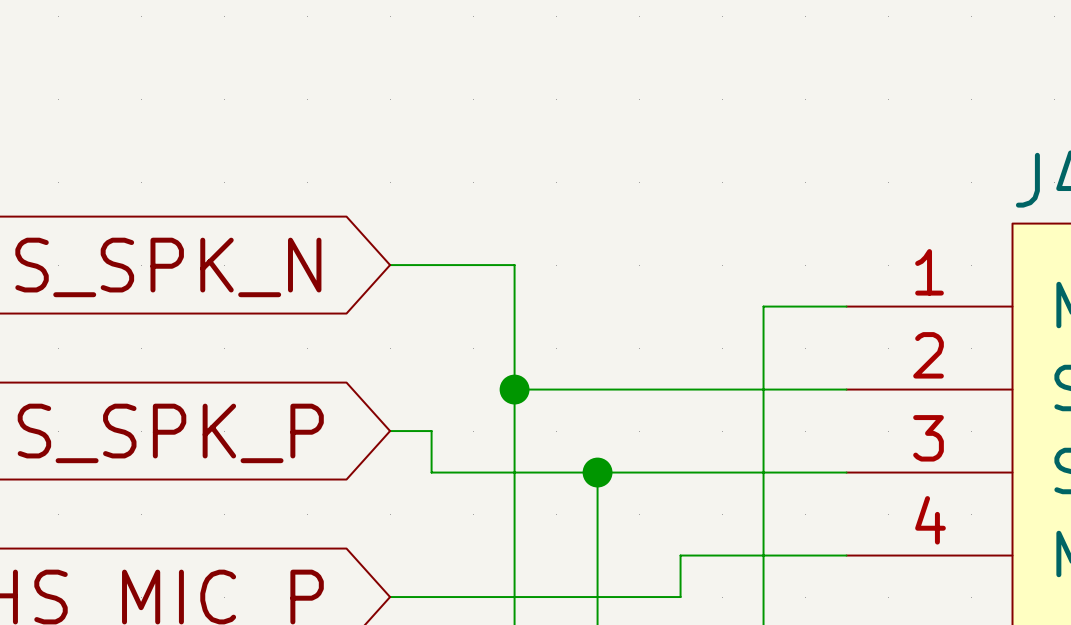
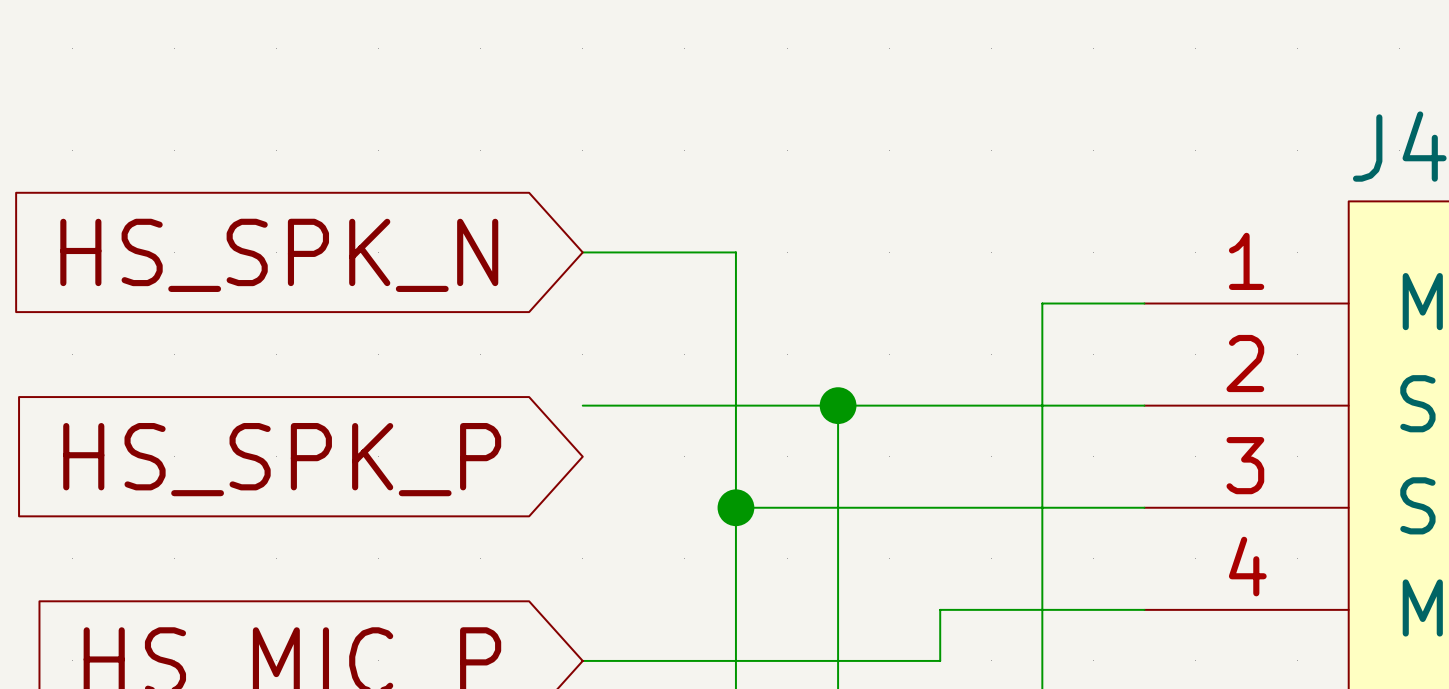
wire: none -> (582, 405) (735, 405)
junction: (514, 389) -> none
wire: none -> (838, 405) (838, 507)
junction: none -> (838, 405)
wire: (390, 431) (431, 431) (431, 472) (514, 472) -> none
junction: none -> (735, 507)
junction: (597, 472) -> none

